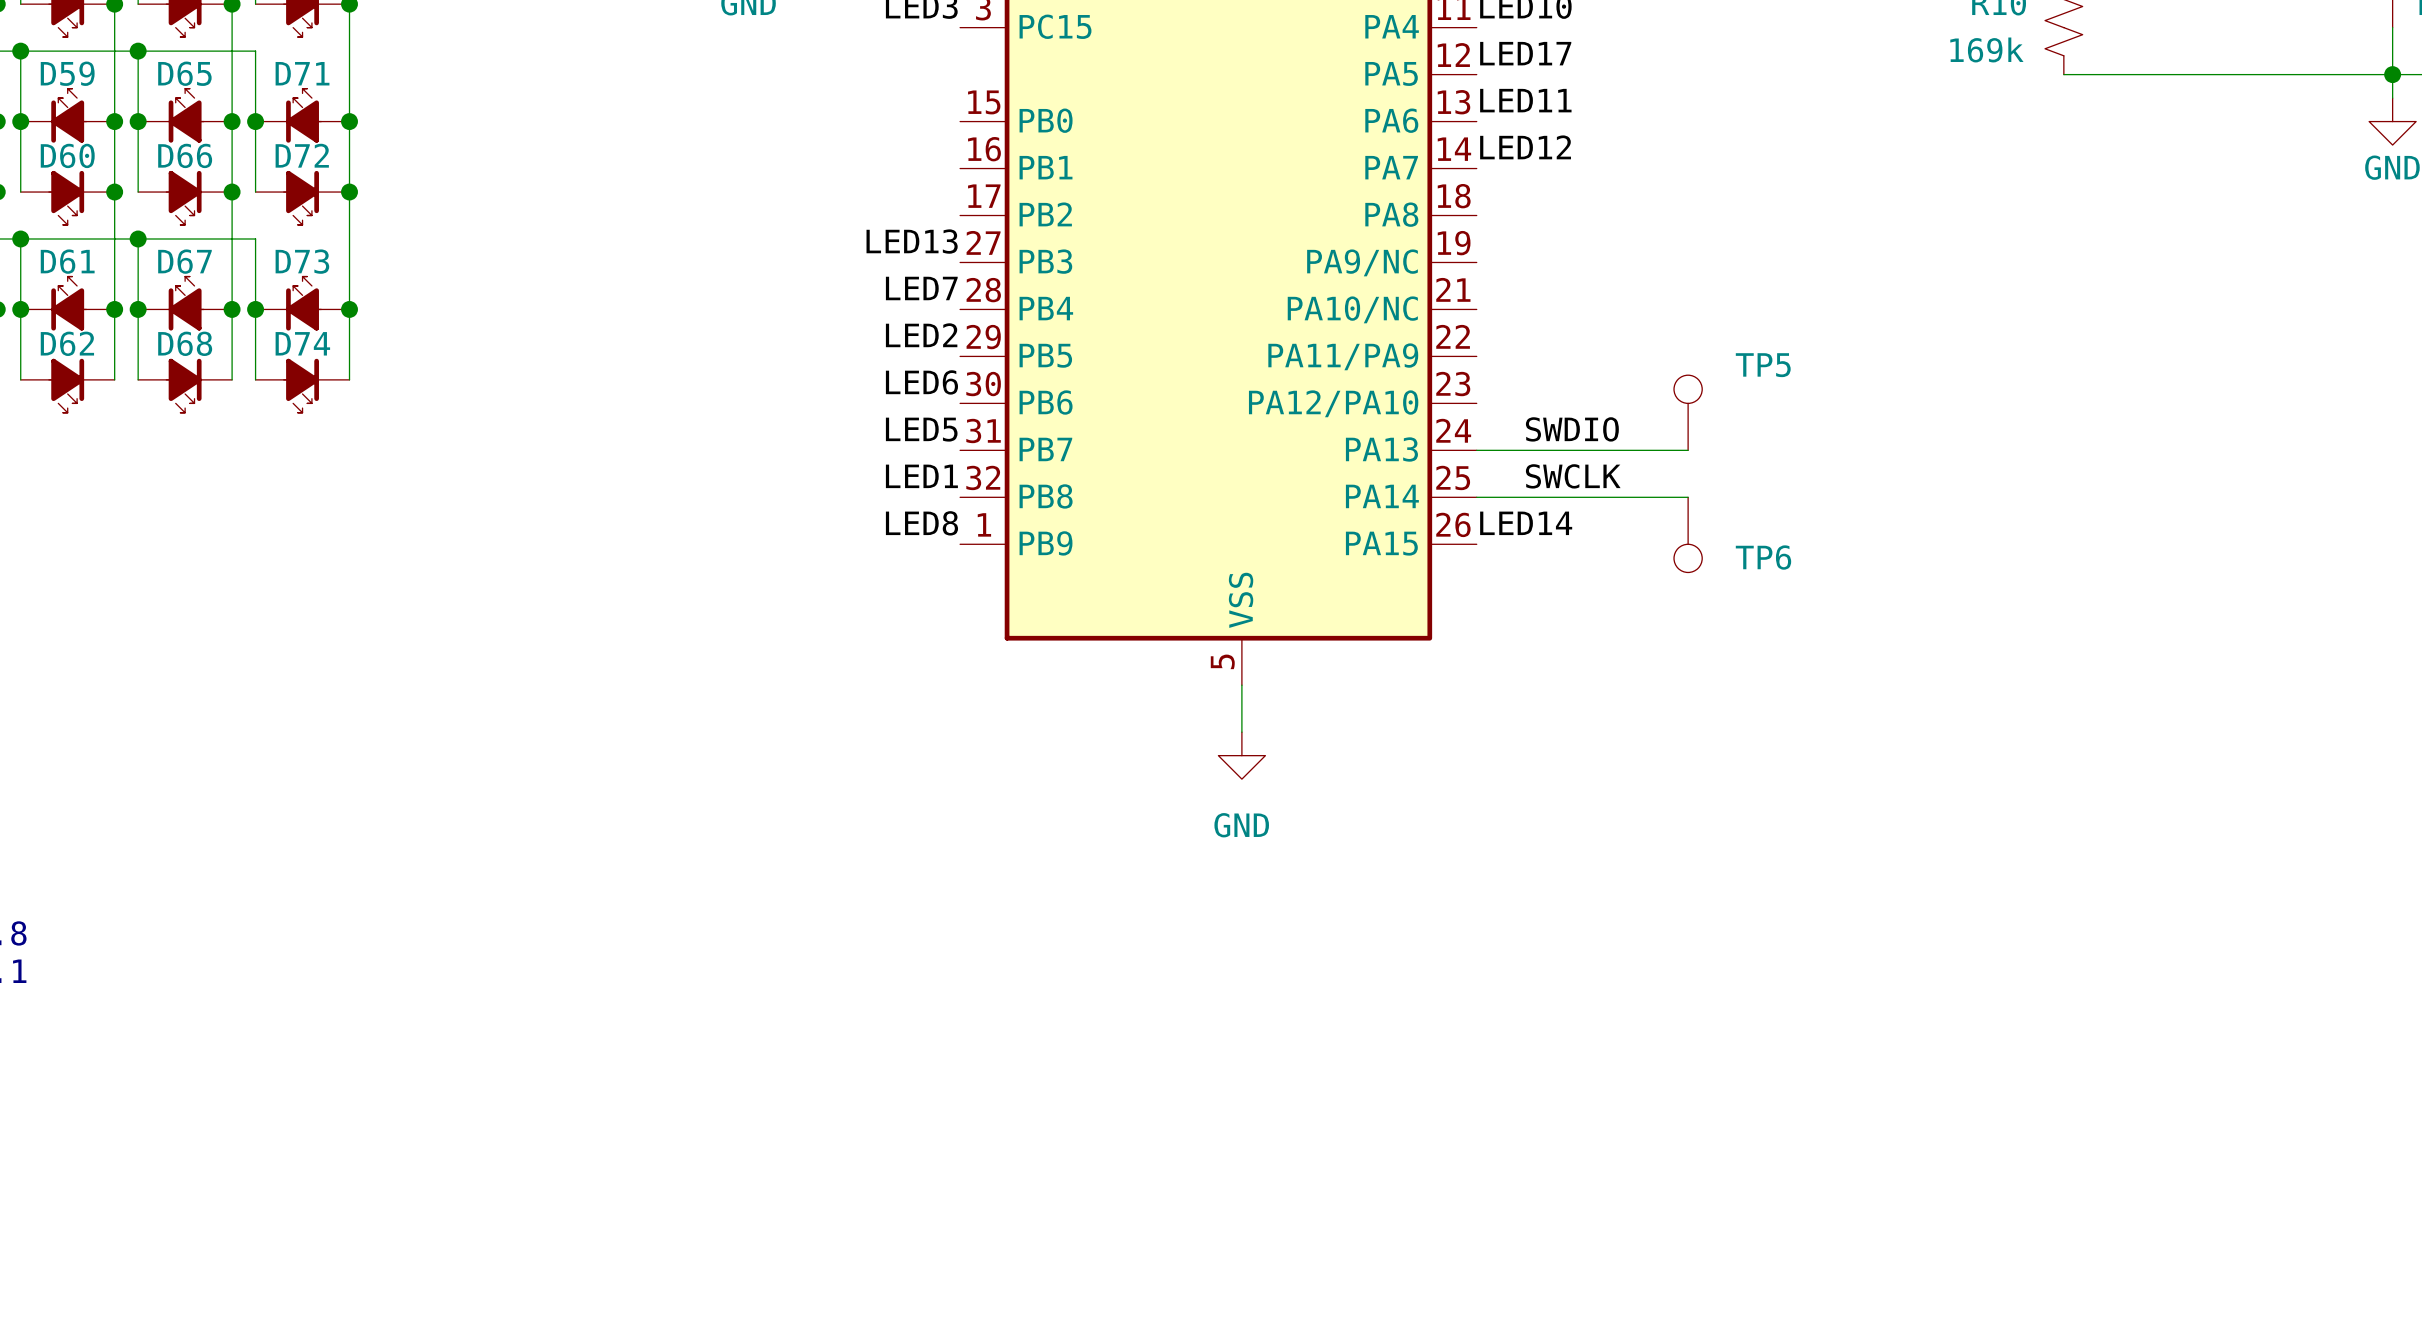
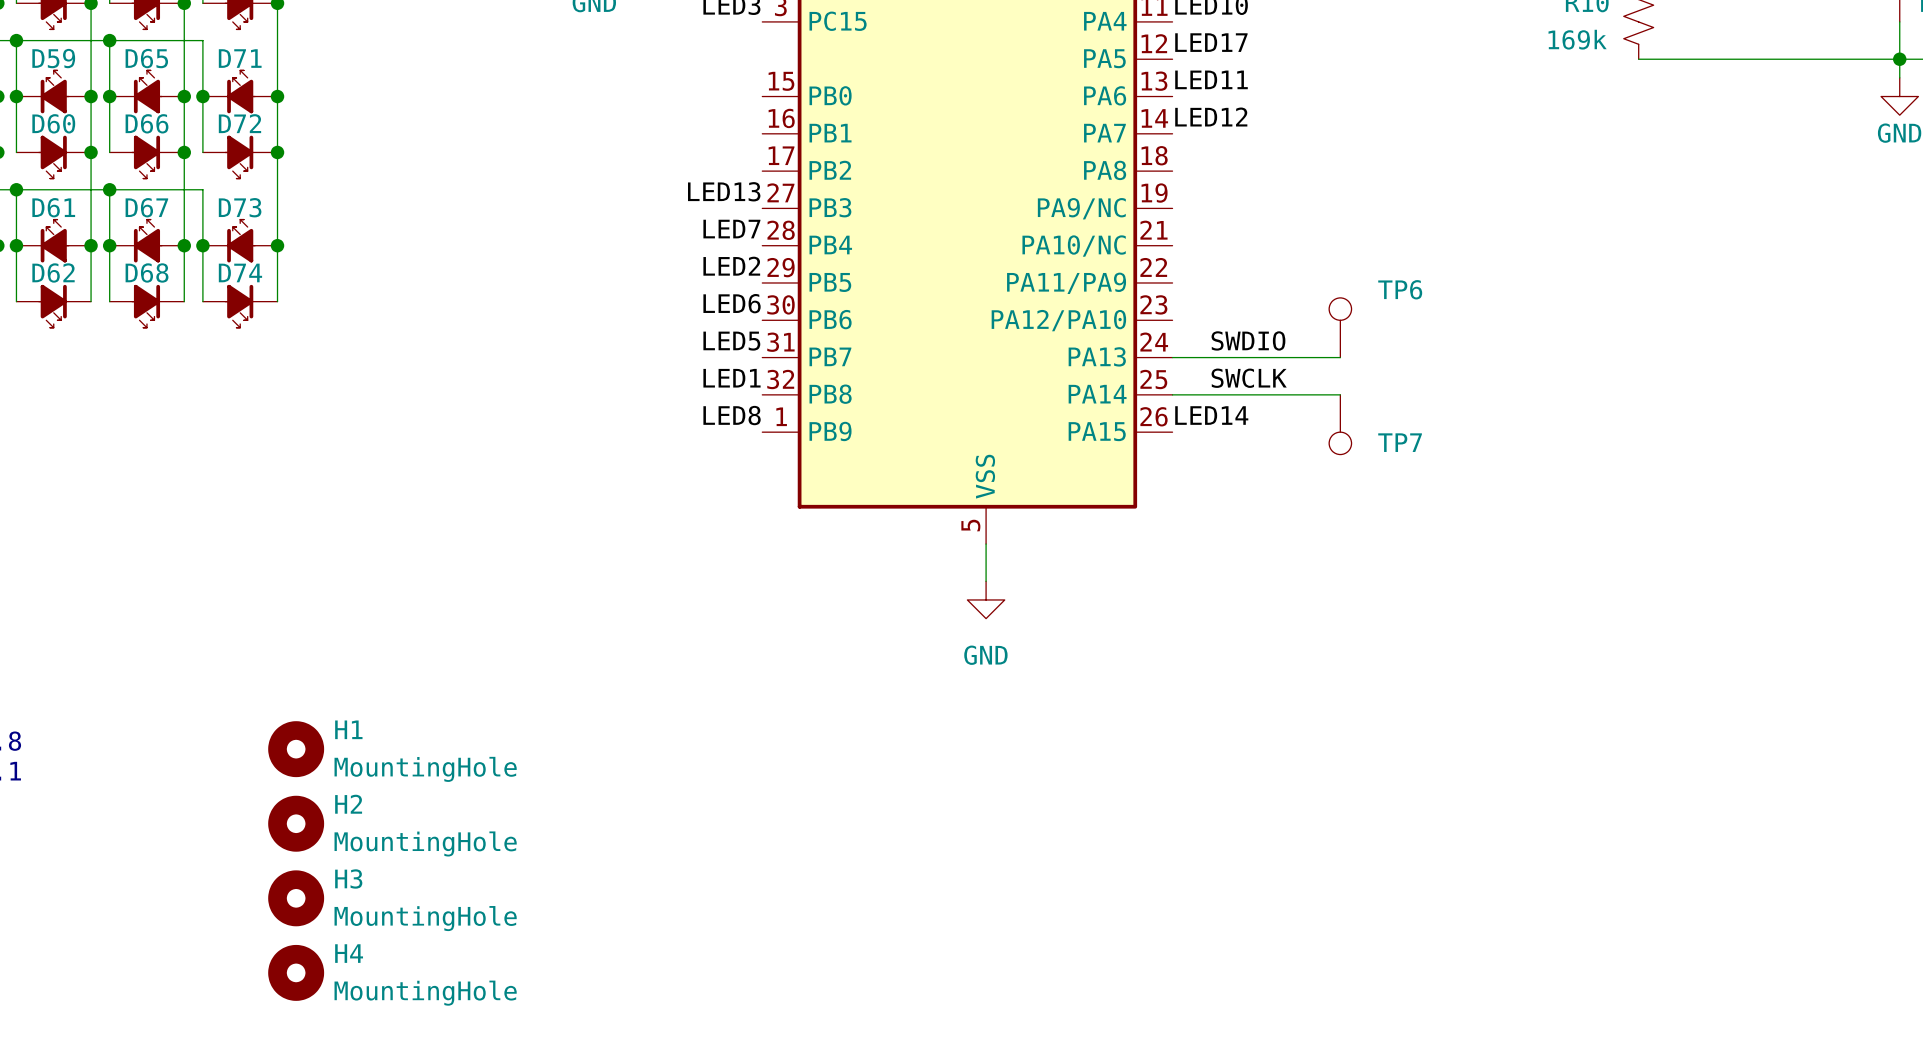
TP5 name: TP5 (1763, 365) -> TP6 (1400, 289)
TP6 name: TP6 (1763, 557) -> TP7 (1400, 442)
H1: none -> MountingHole (296, 749)
H2: none -> MountingHole (296, 823)
H3: none -> MountingHole (296, 898)
H4: none -> MountingHole (296, 972)

